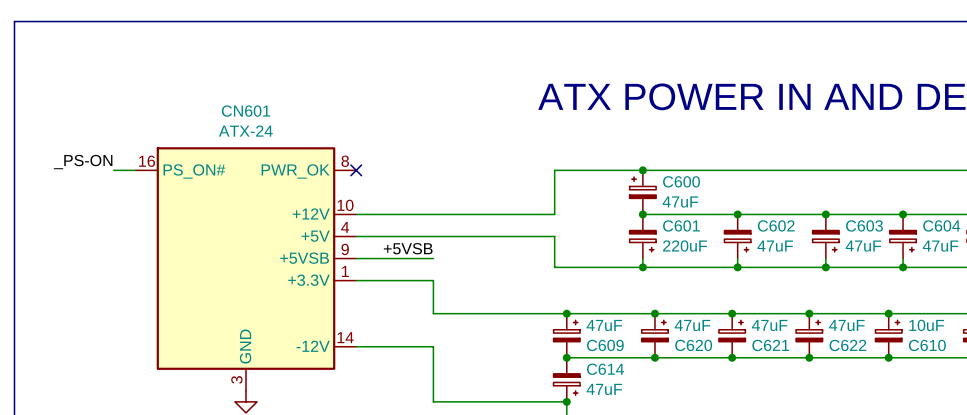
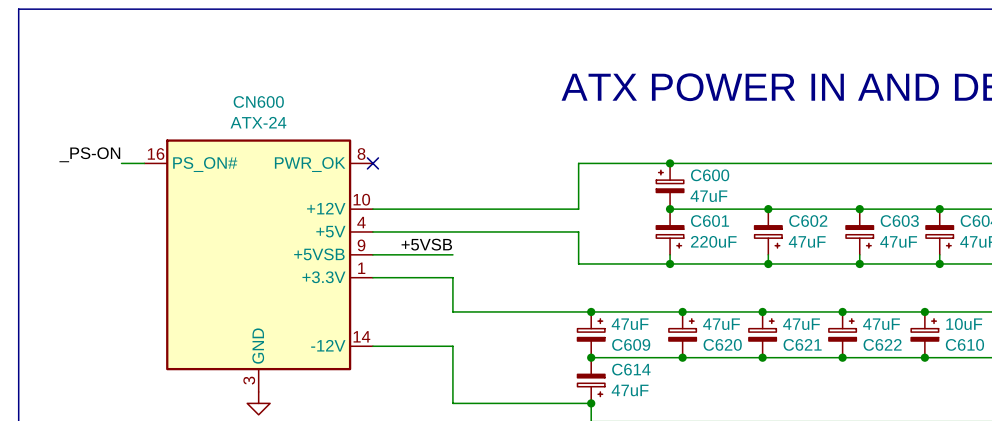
CN601 name: CN601 (246, 111) -> CN600 (258, 101)

